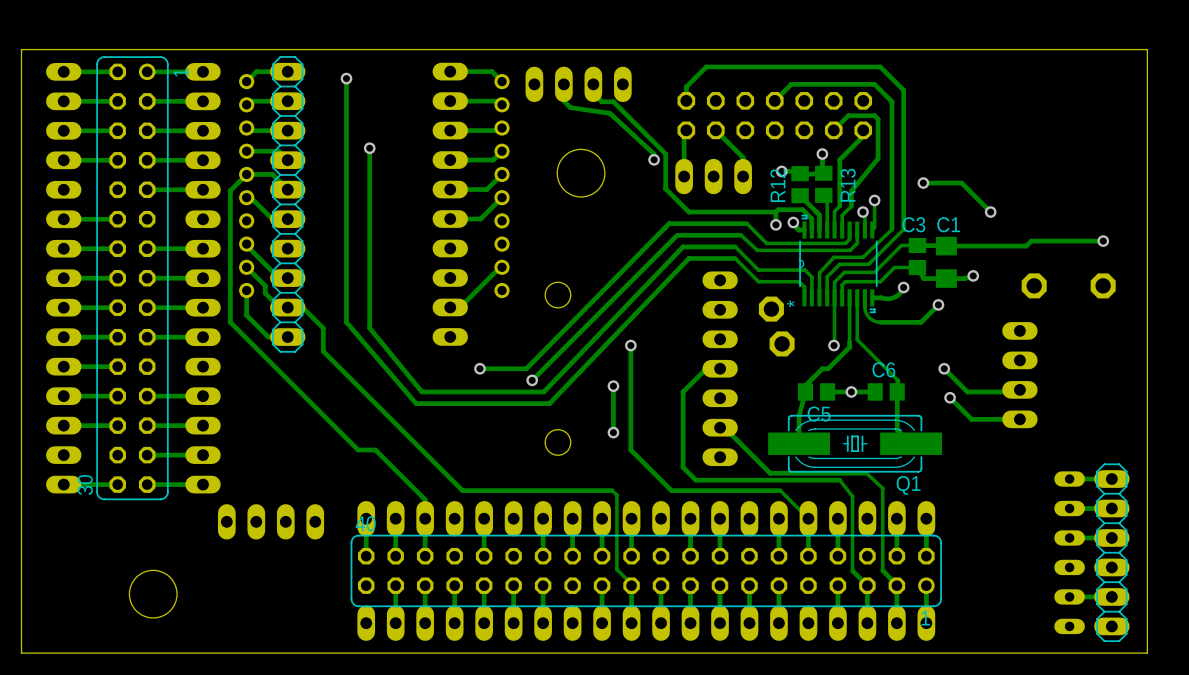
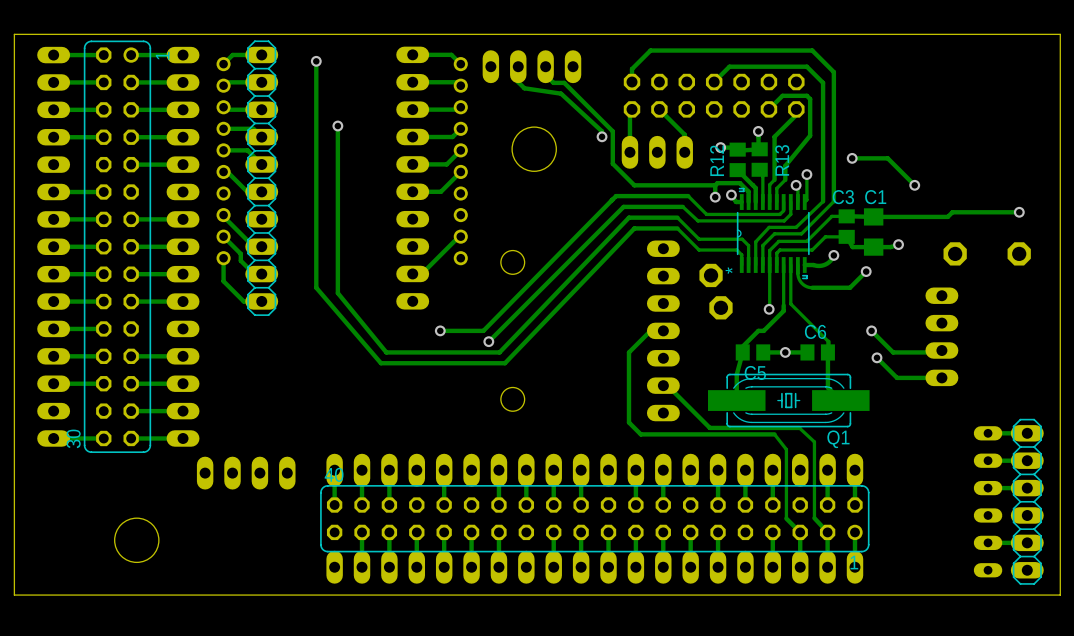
track: (246, 174) (230, 190) (230, 322) (358, 450) (375, 450) (425, 499) (425, 518) -> none
track: (287, 307) (302, 307) (323, 328) (323, 351) (462, 490) (612, 490) (616, 495) (616, 569) (631, 585) -> none
track: (630, 345) (630, 450) (671, 490) (780, 490) (808, 518) -> none
via: (630, 345) -> none
track: (613, 386) (613, 432) -> none
via: (613, 386) -> none
via: (613, 432) -> none

